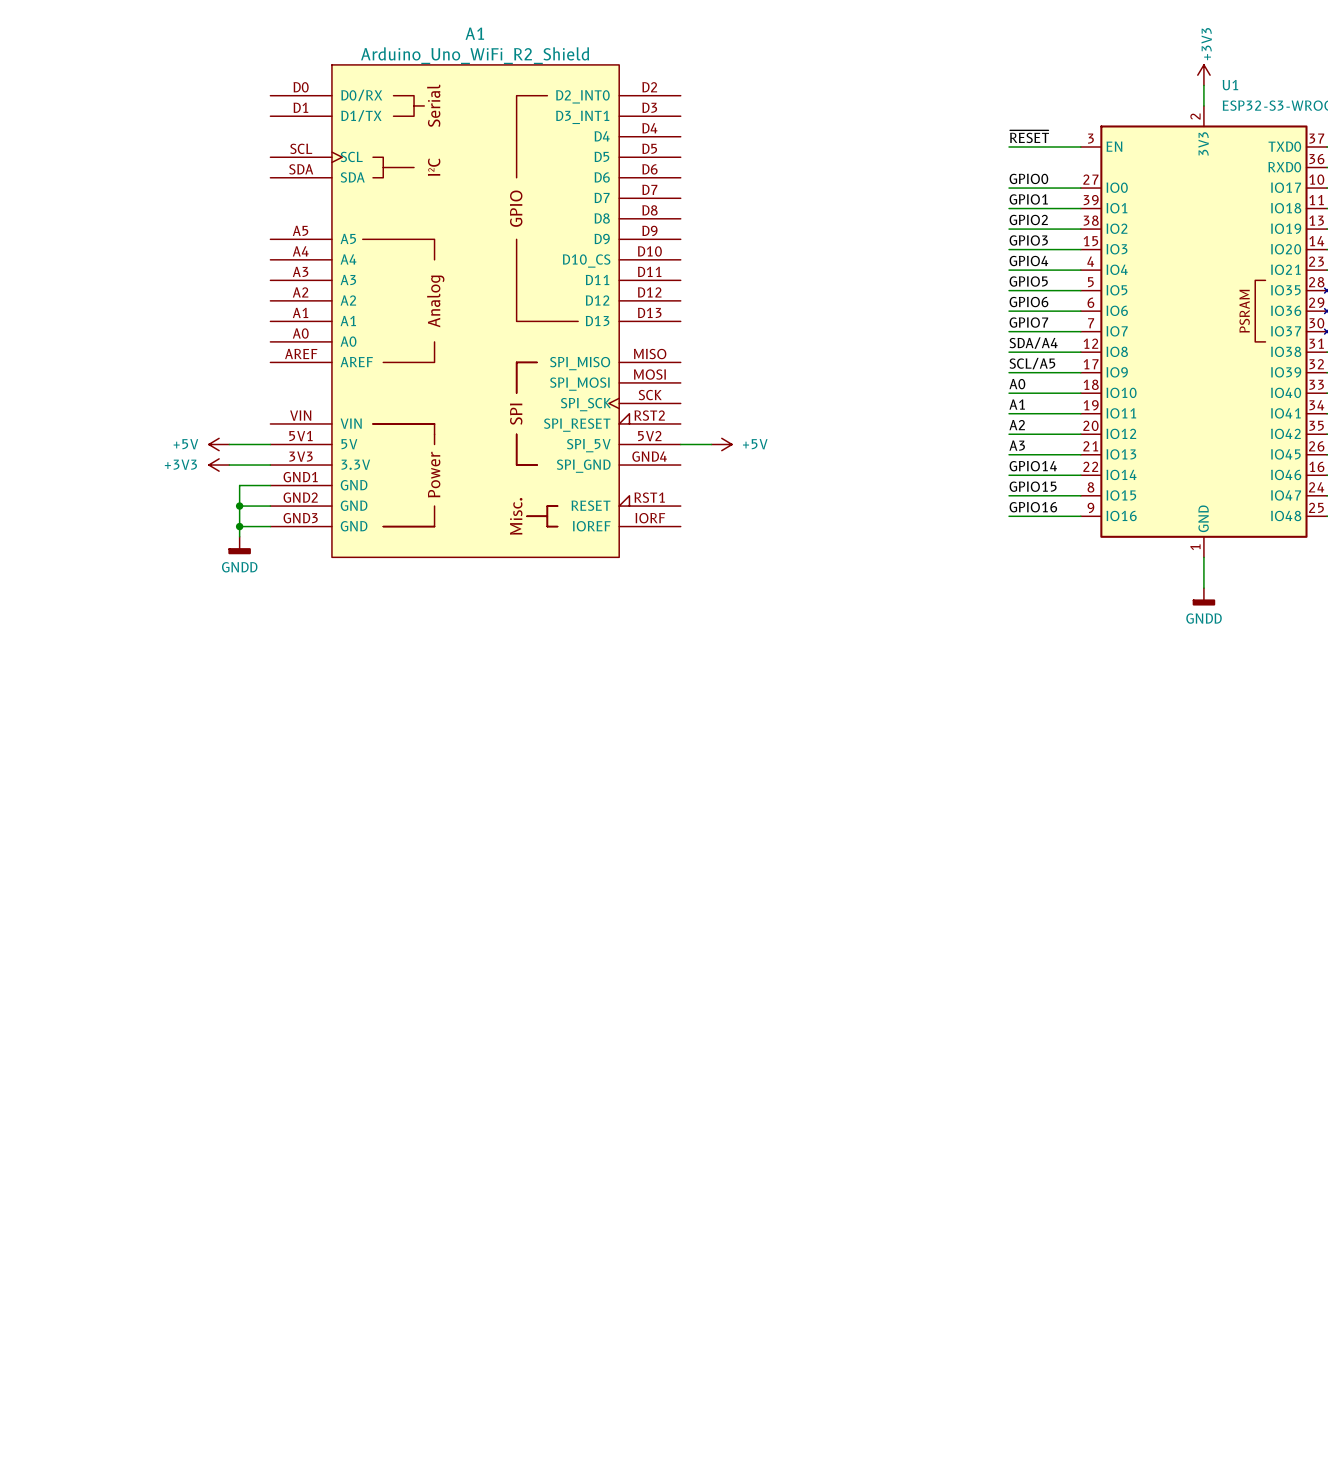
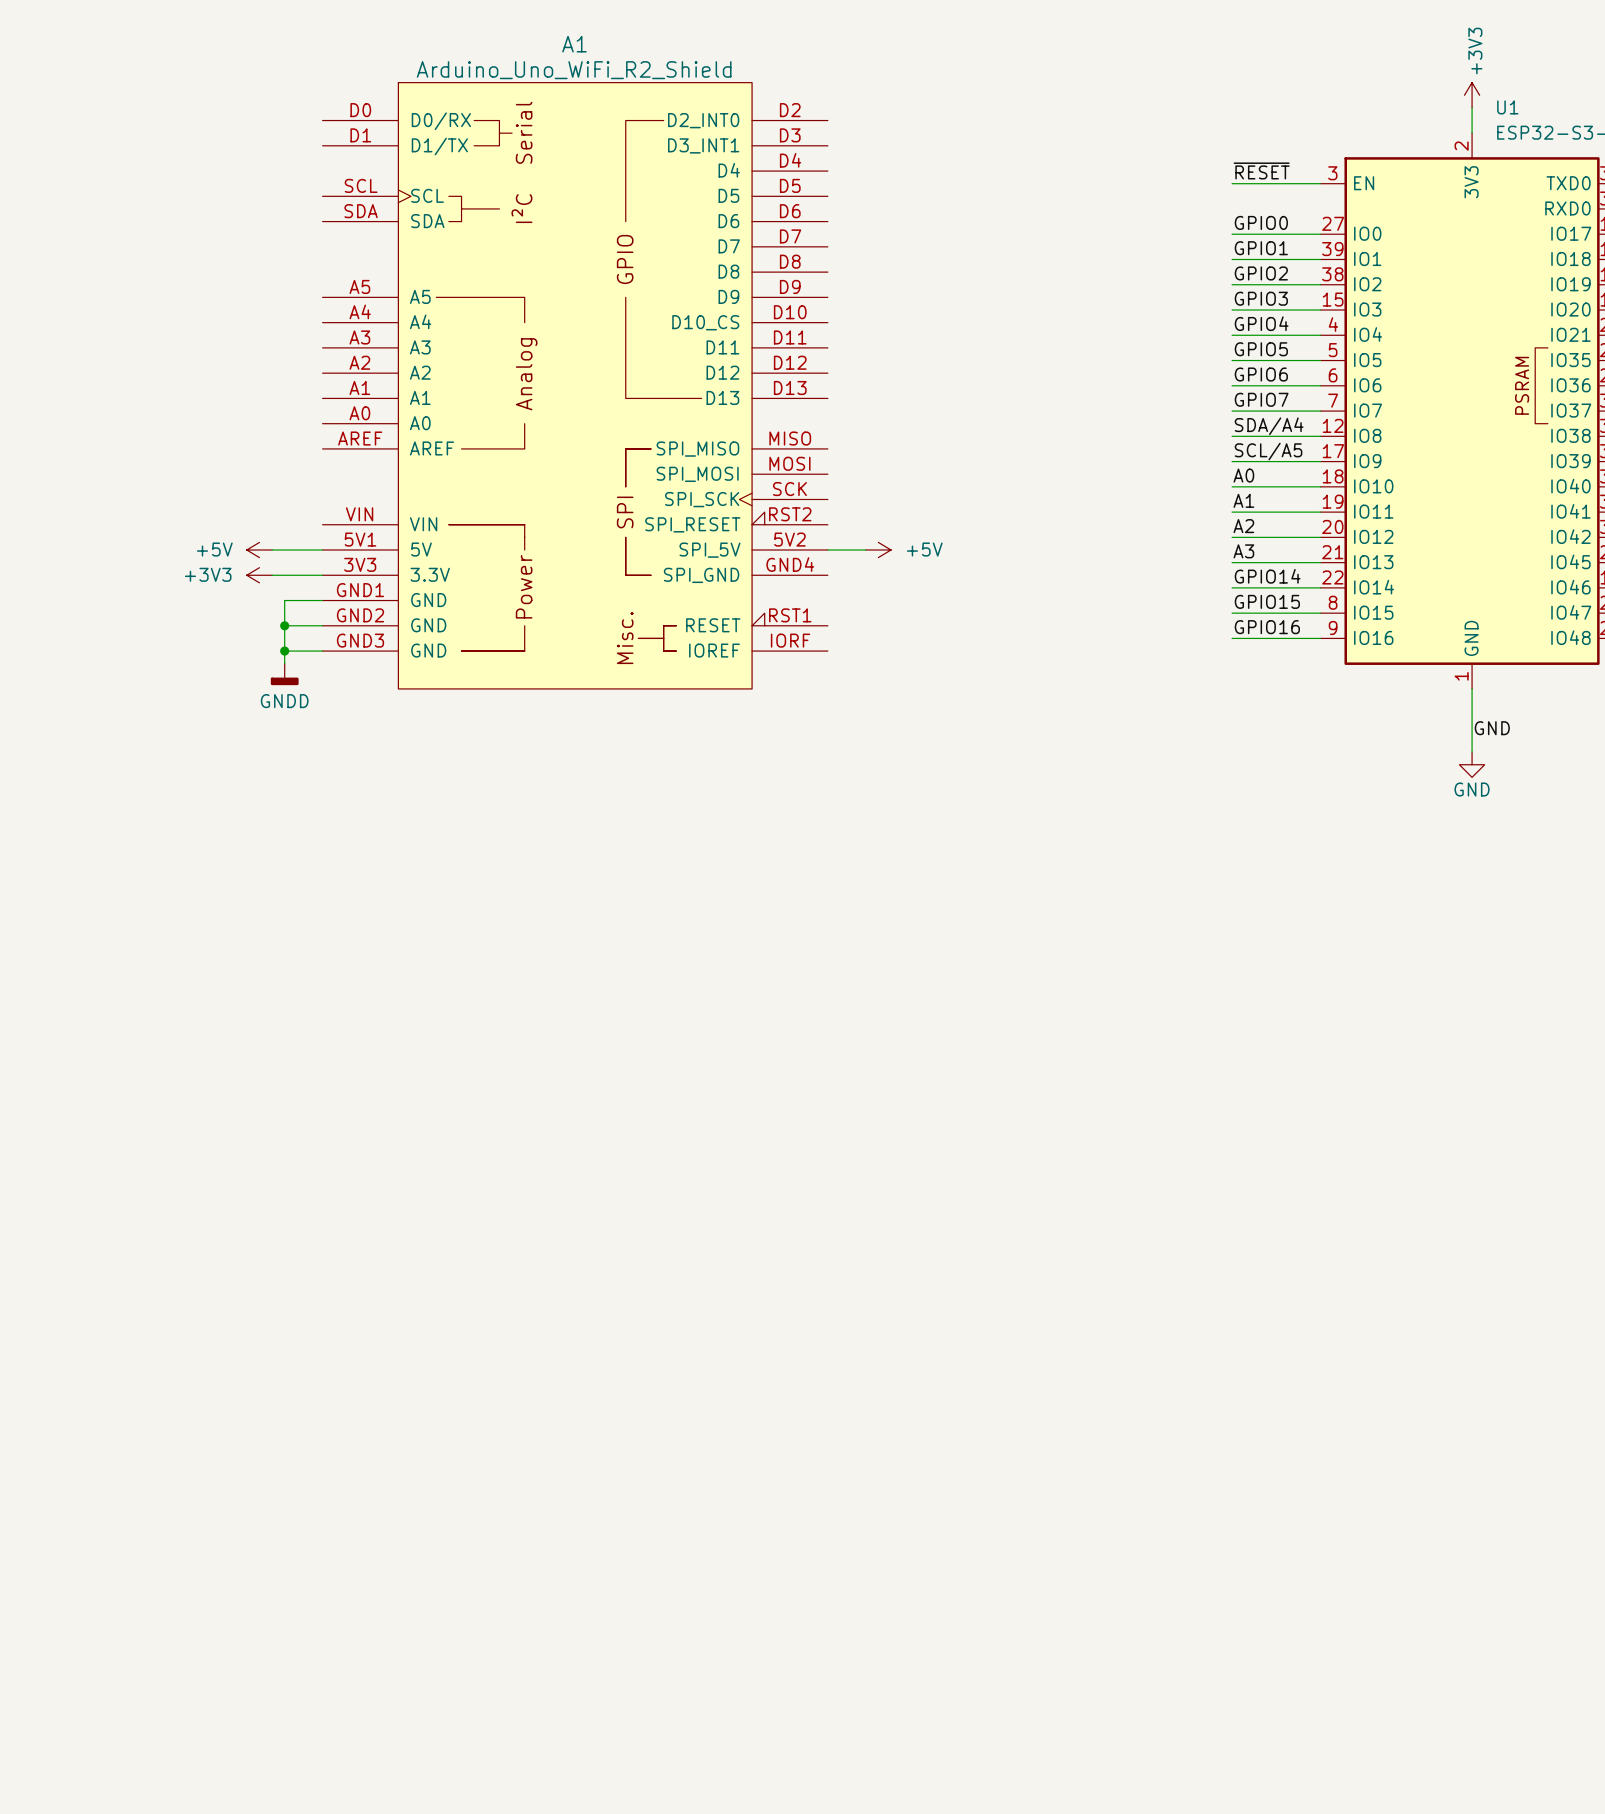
label: none -> GND (1492, 728)
power symbol: GNDD (1203, 596) -> none
power symbol: none -> GND (1472, 764)

